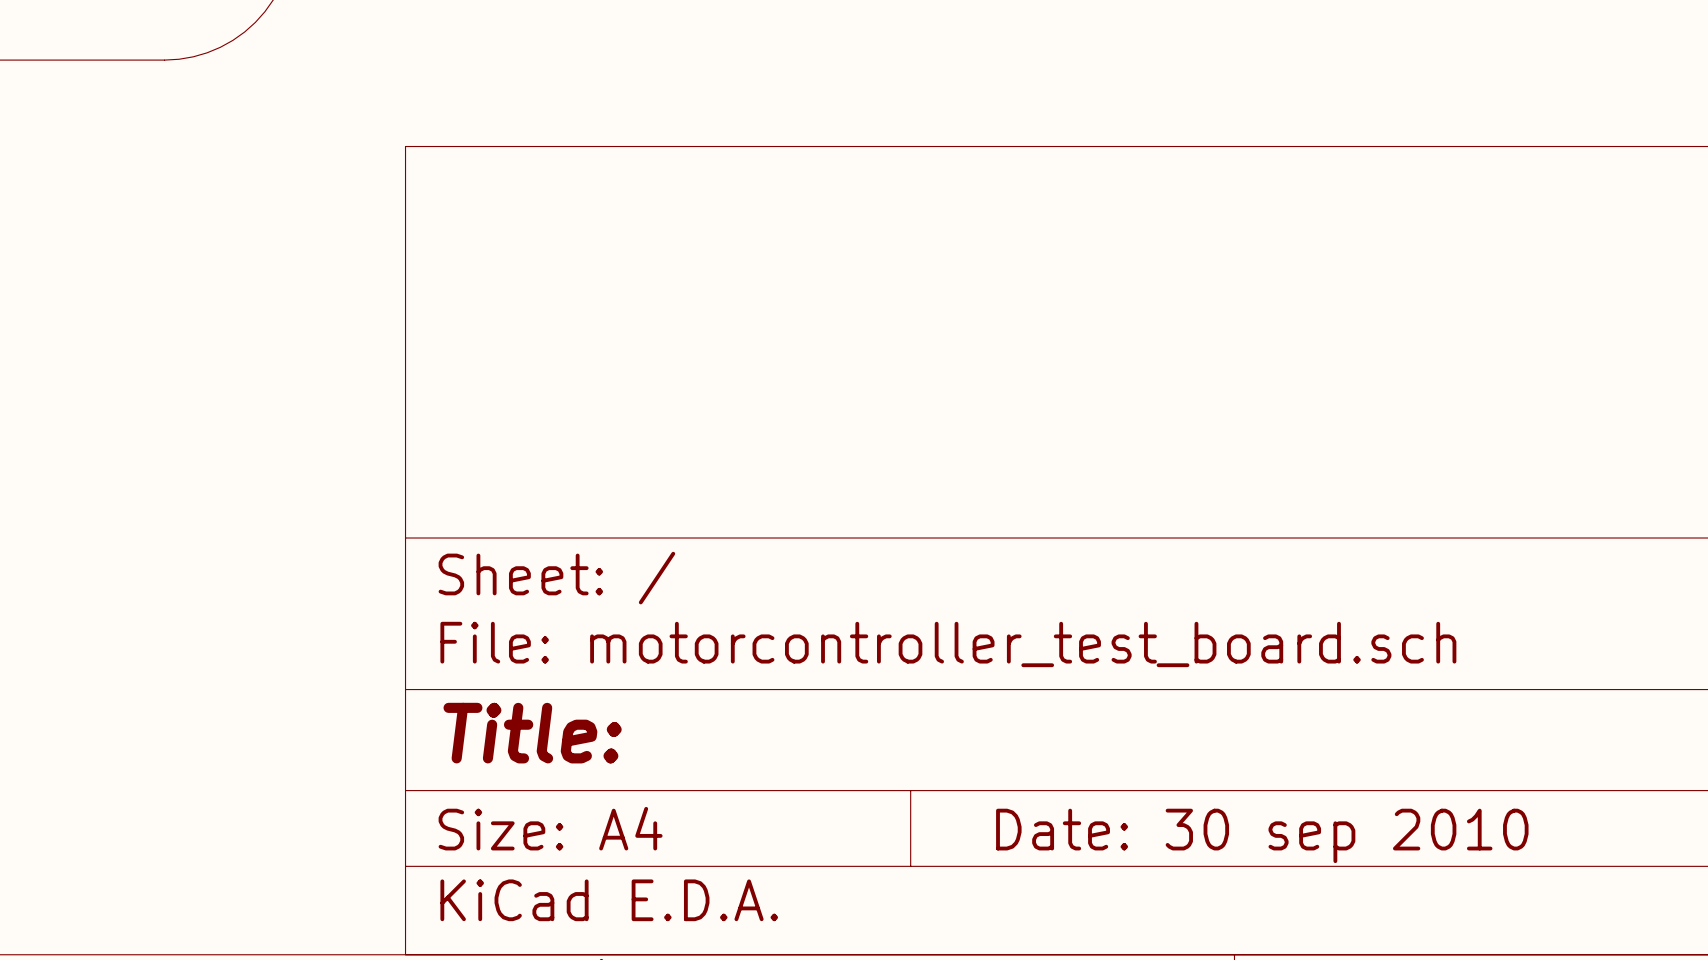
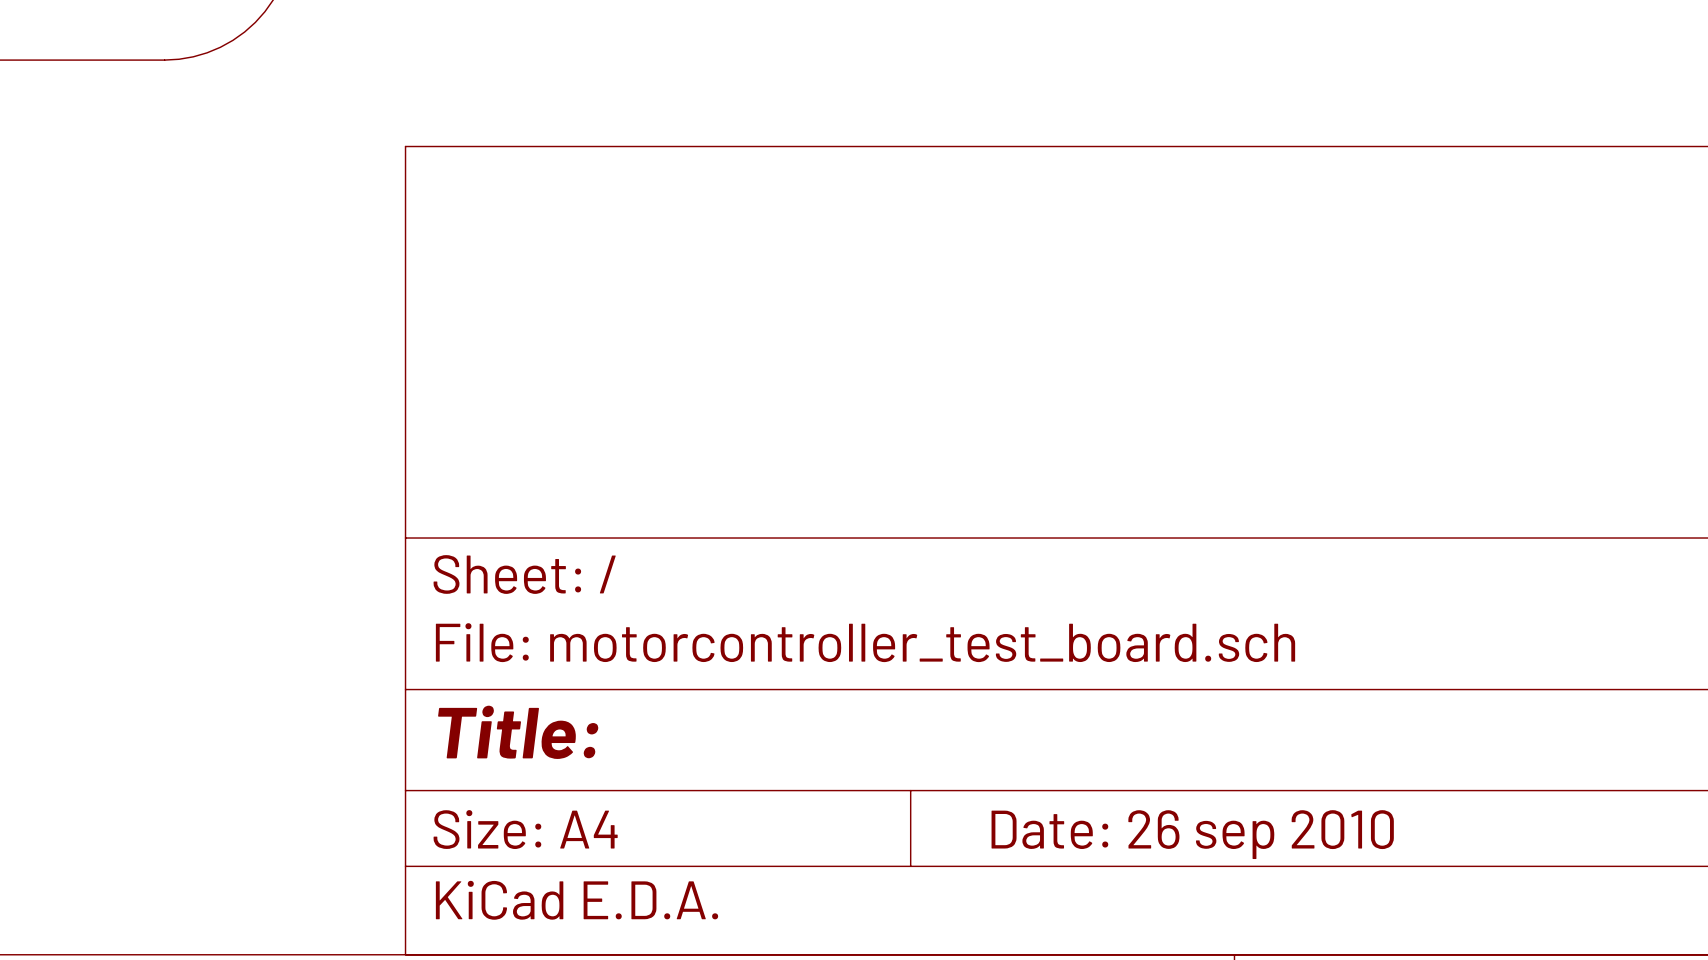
title block: Date: 30 sep 2010 (1262, 835) -> Date: 26 sep 2010 (1192, 834)

